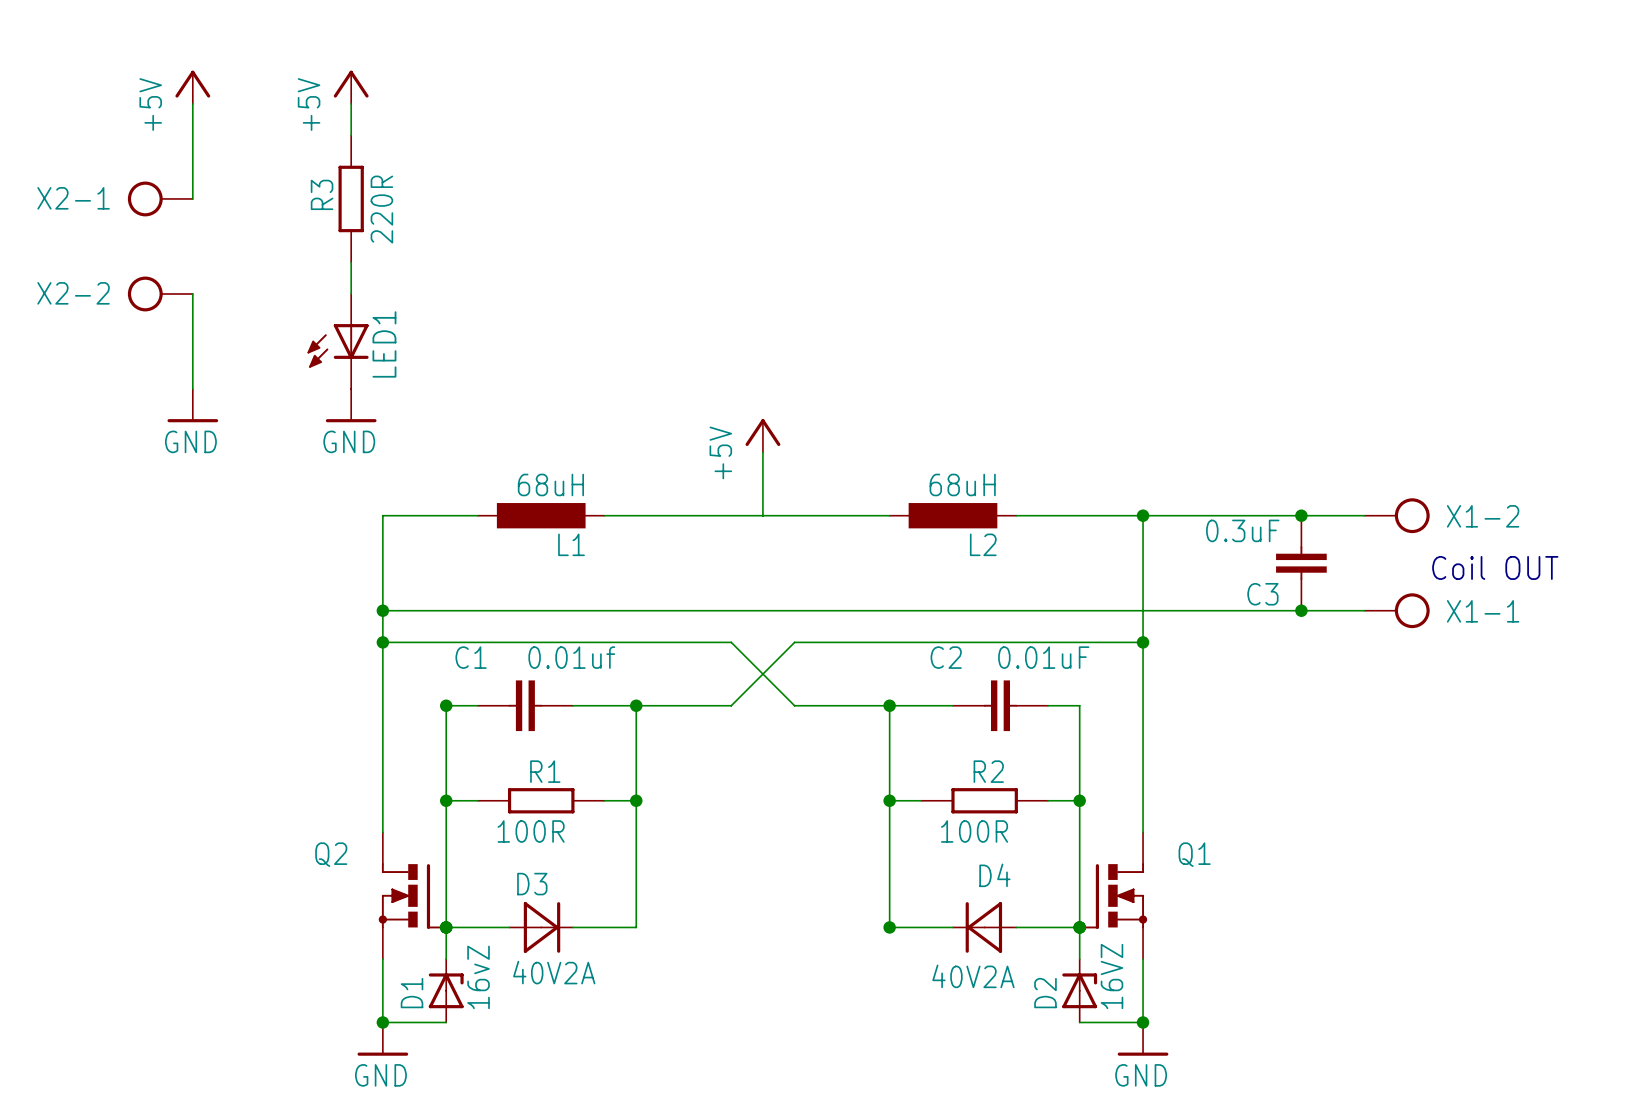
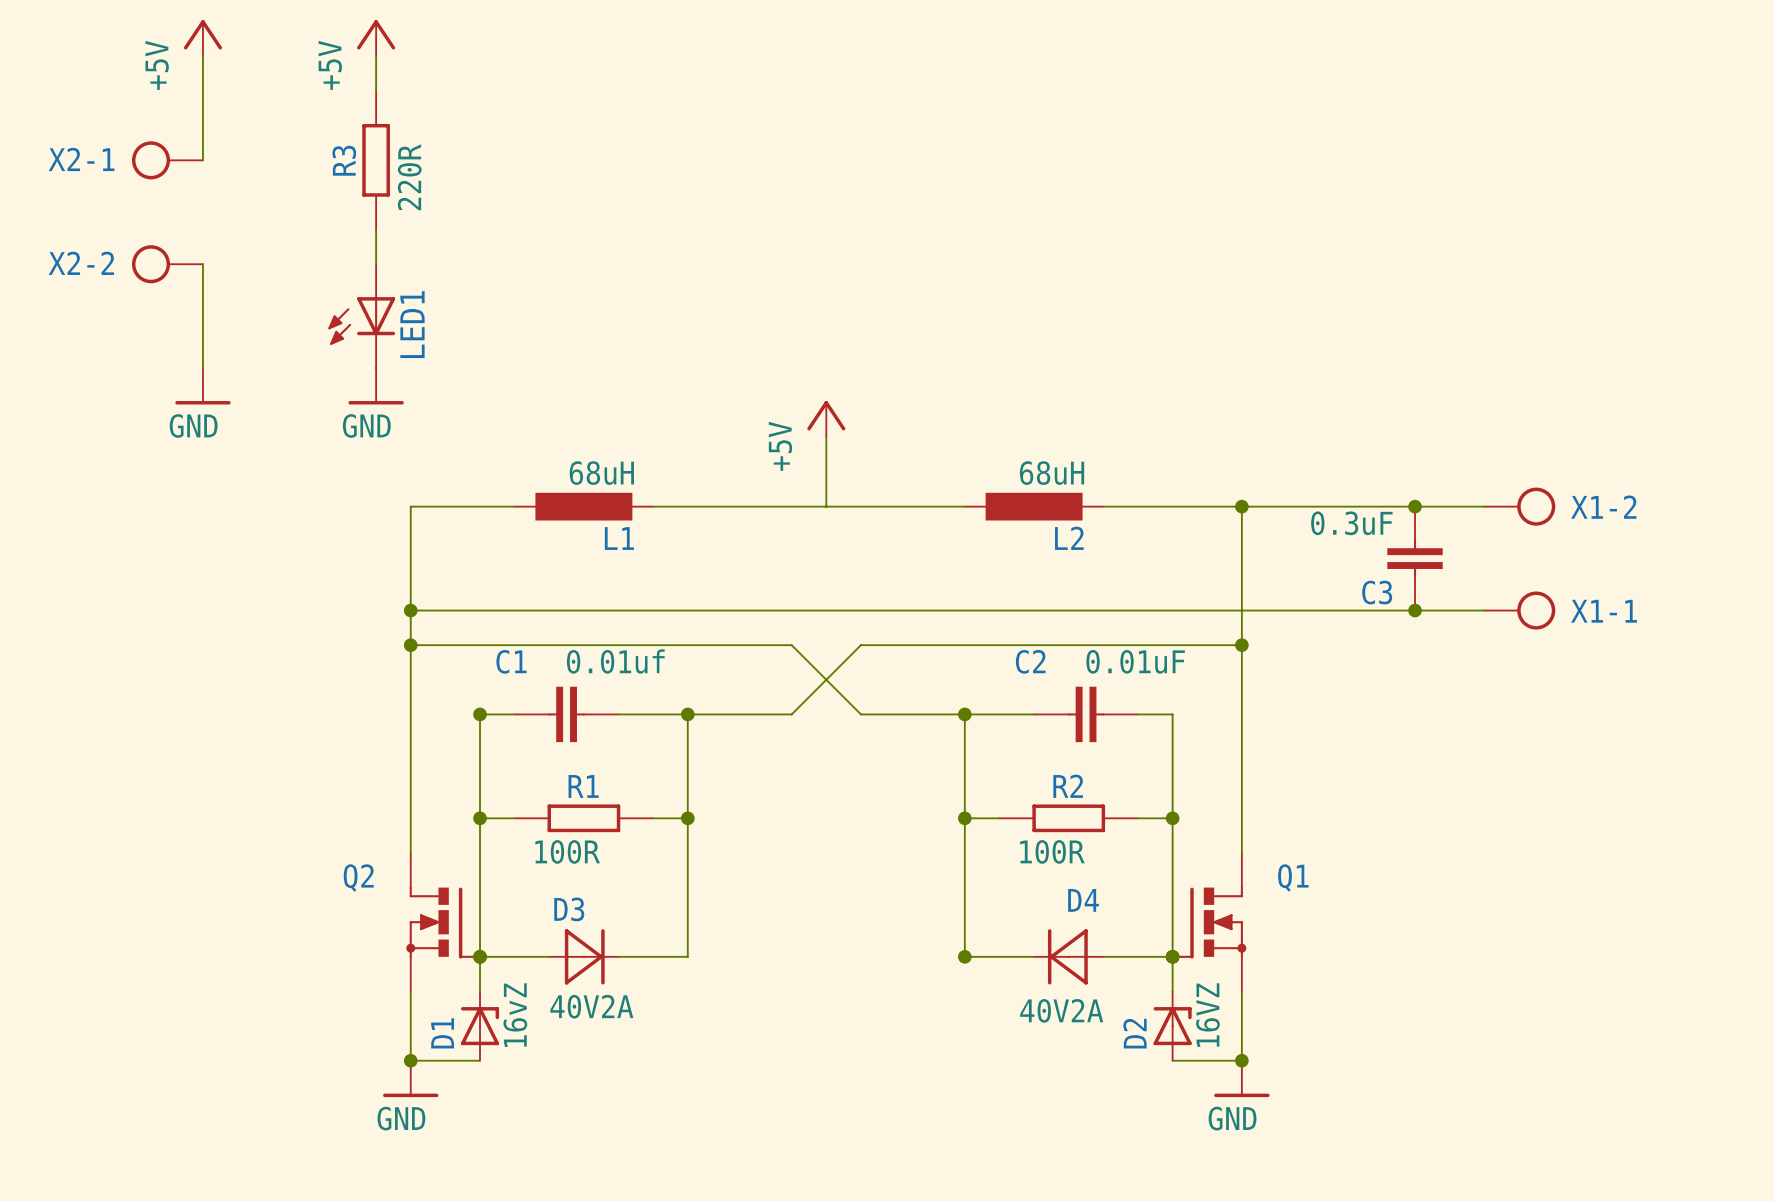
text: Coil OUT (1495, 567) -> none

